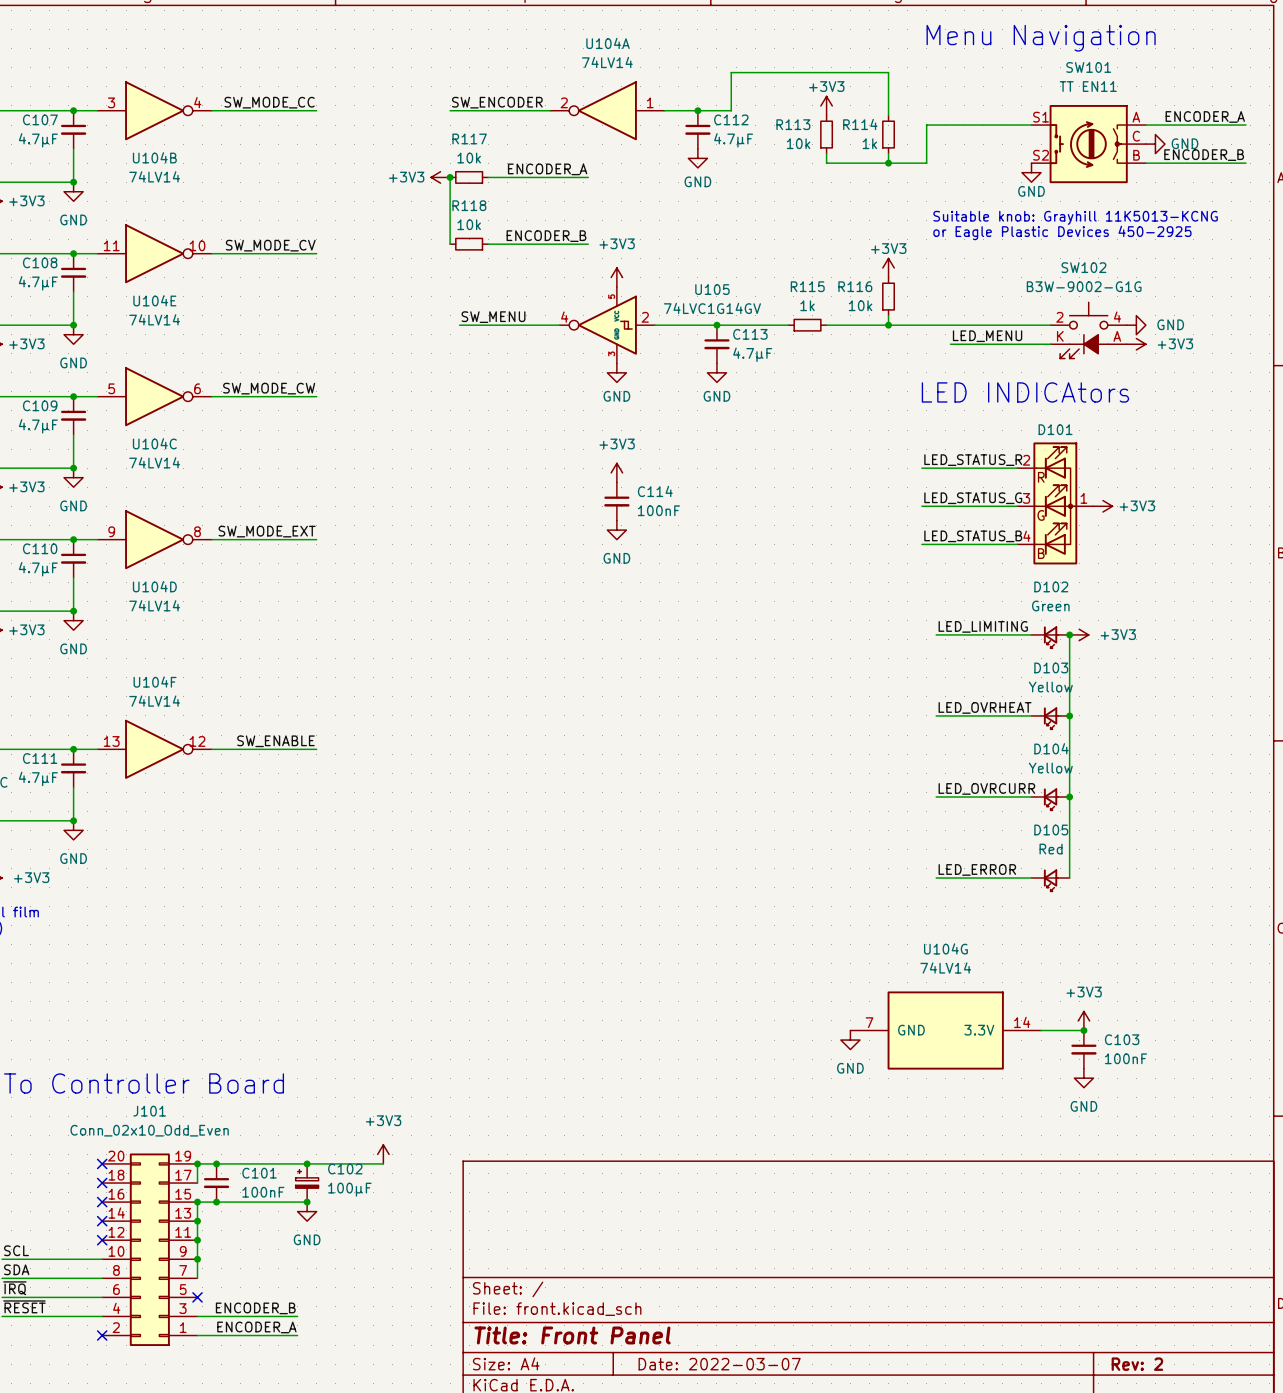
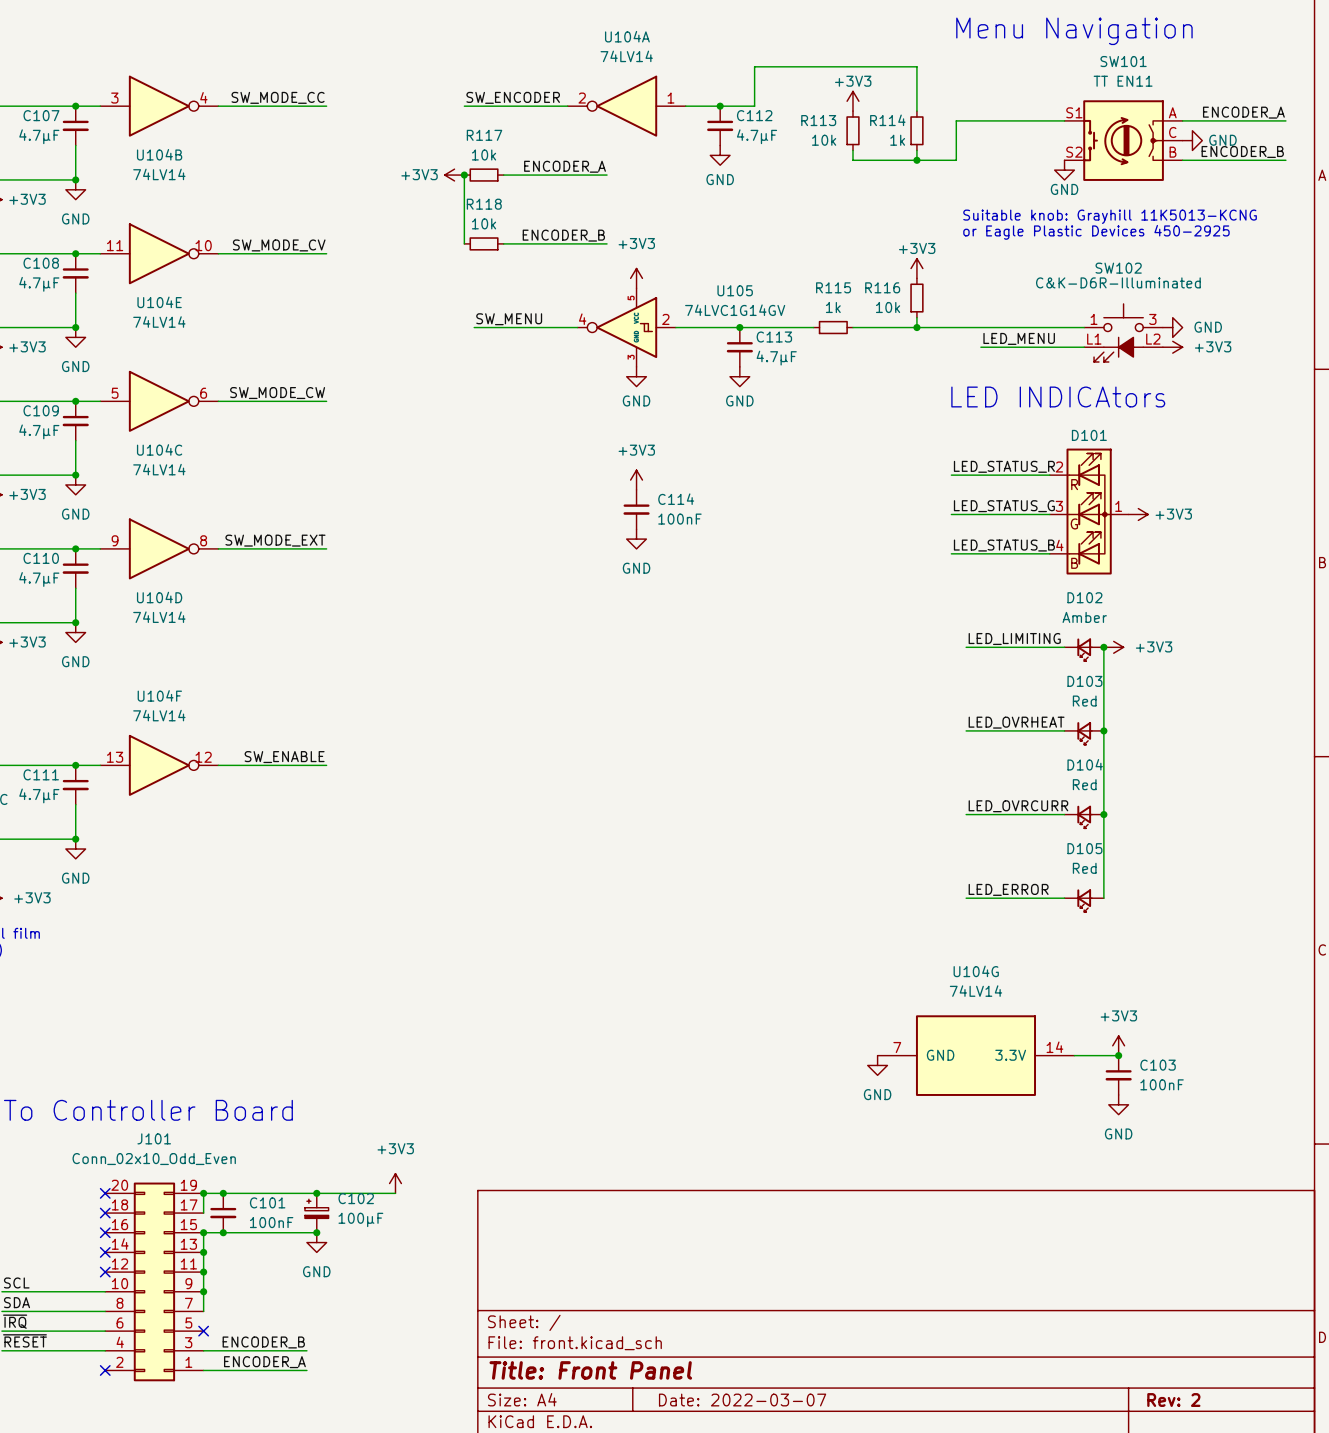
SW102 value: B3W-9002-G1G (1084, 286) -> C&K-D6R-Illuminated (1118, 282)
SW102 pin number: 2 (1059, 317) -> 1 (1094, 319)
SW102 pin number: 4 (1117, 317) -> 3 (1152, 319)
SW102 pin number: K (1060, 336) -> L1 (1094, 339)
SW102 pin number: A (1117, 336) -> L2 (1153, 339)
D102 value: Green (1050, 606) -> Amber (1084, 617)
D103 value: Yellow (1050, 687) -> Red (1084, 701)
D104 value: Yellow (1050, 768) -> Red (1084, 784)

